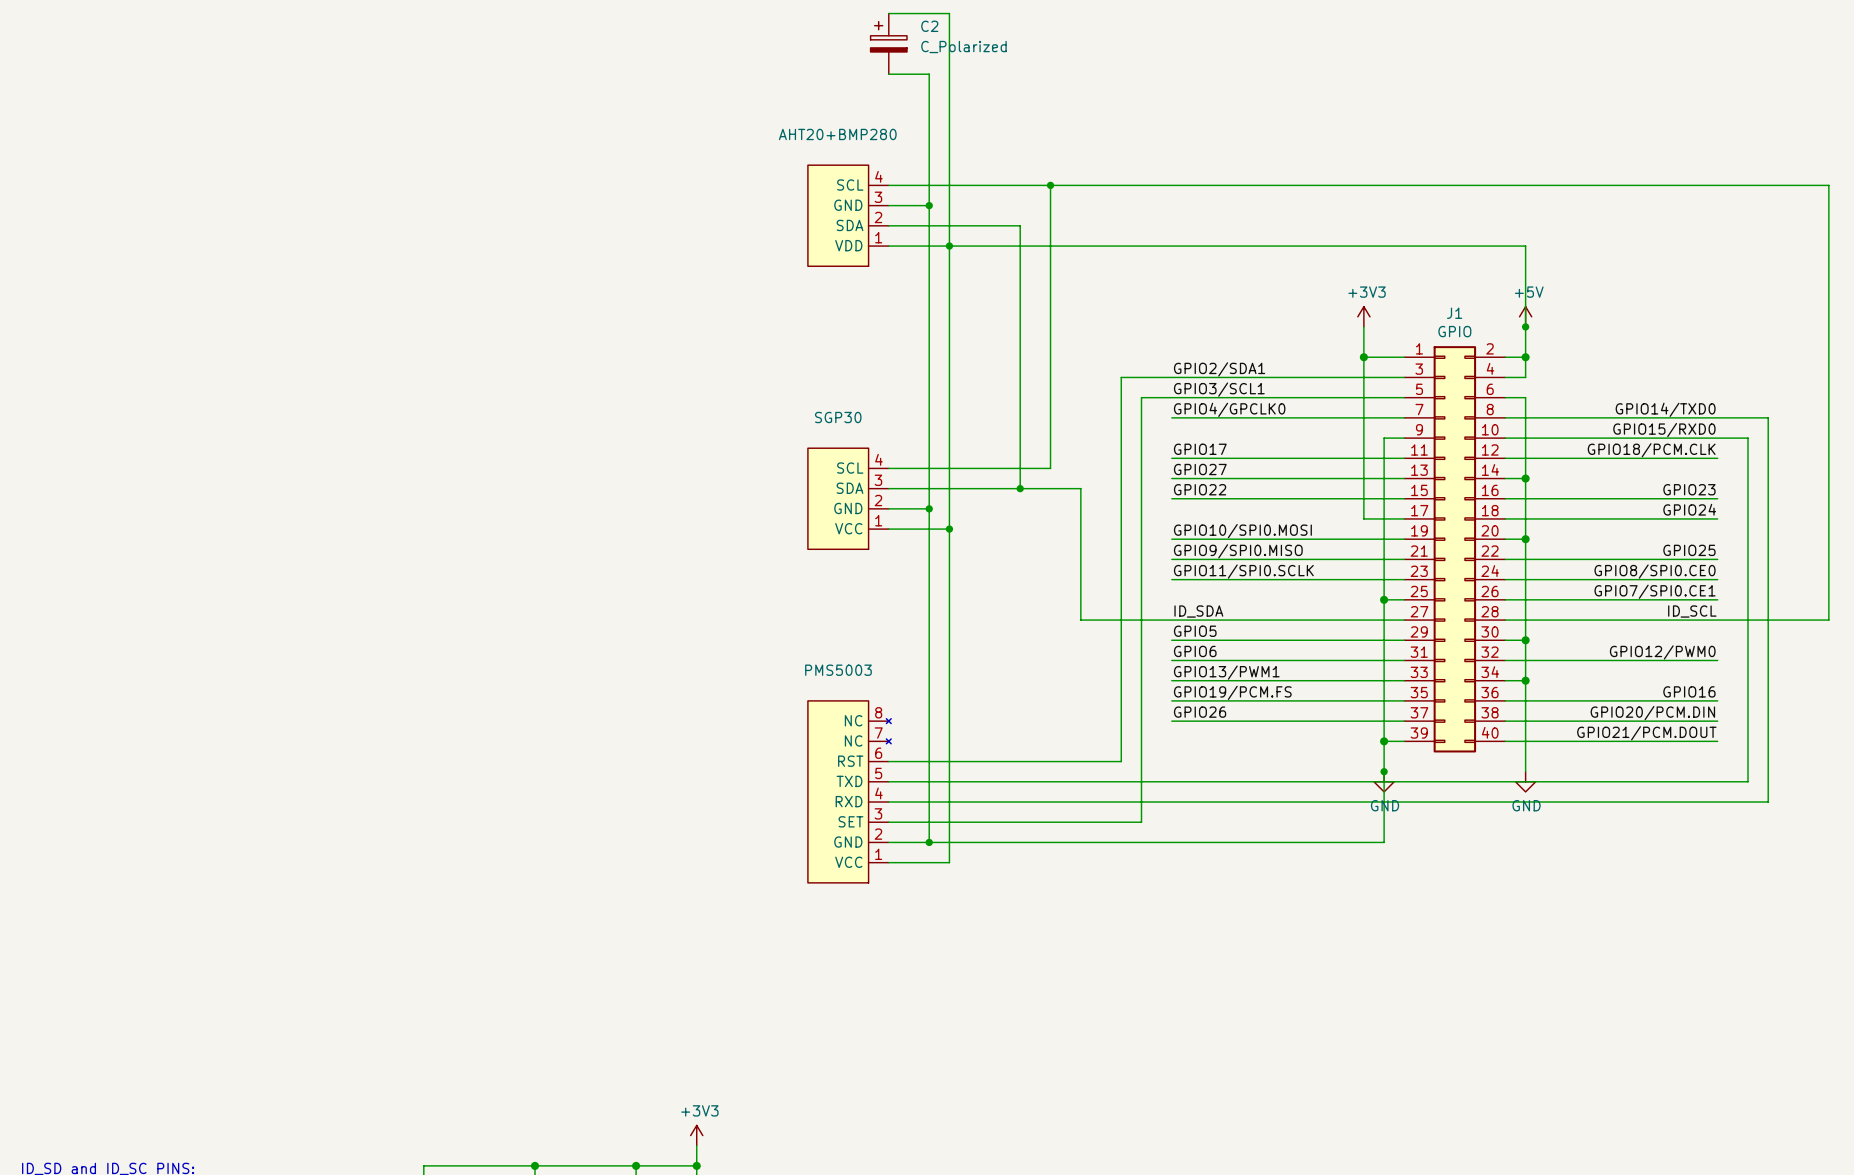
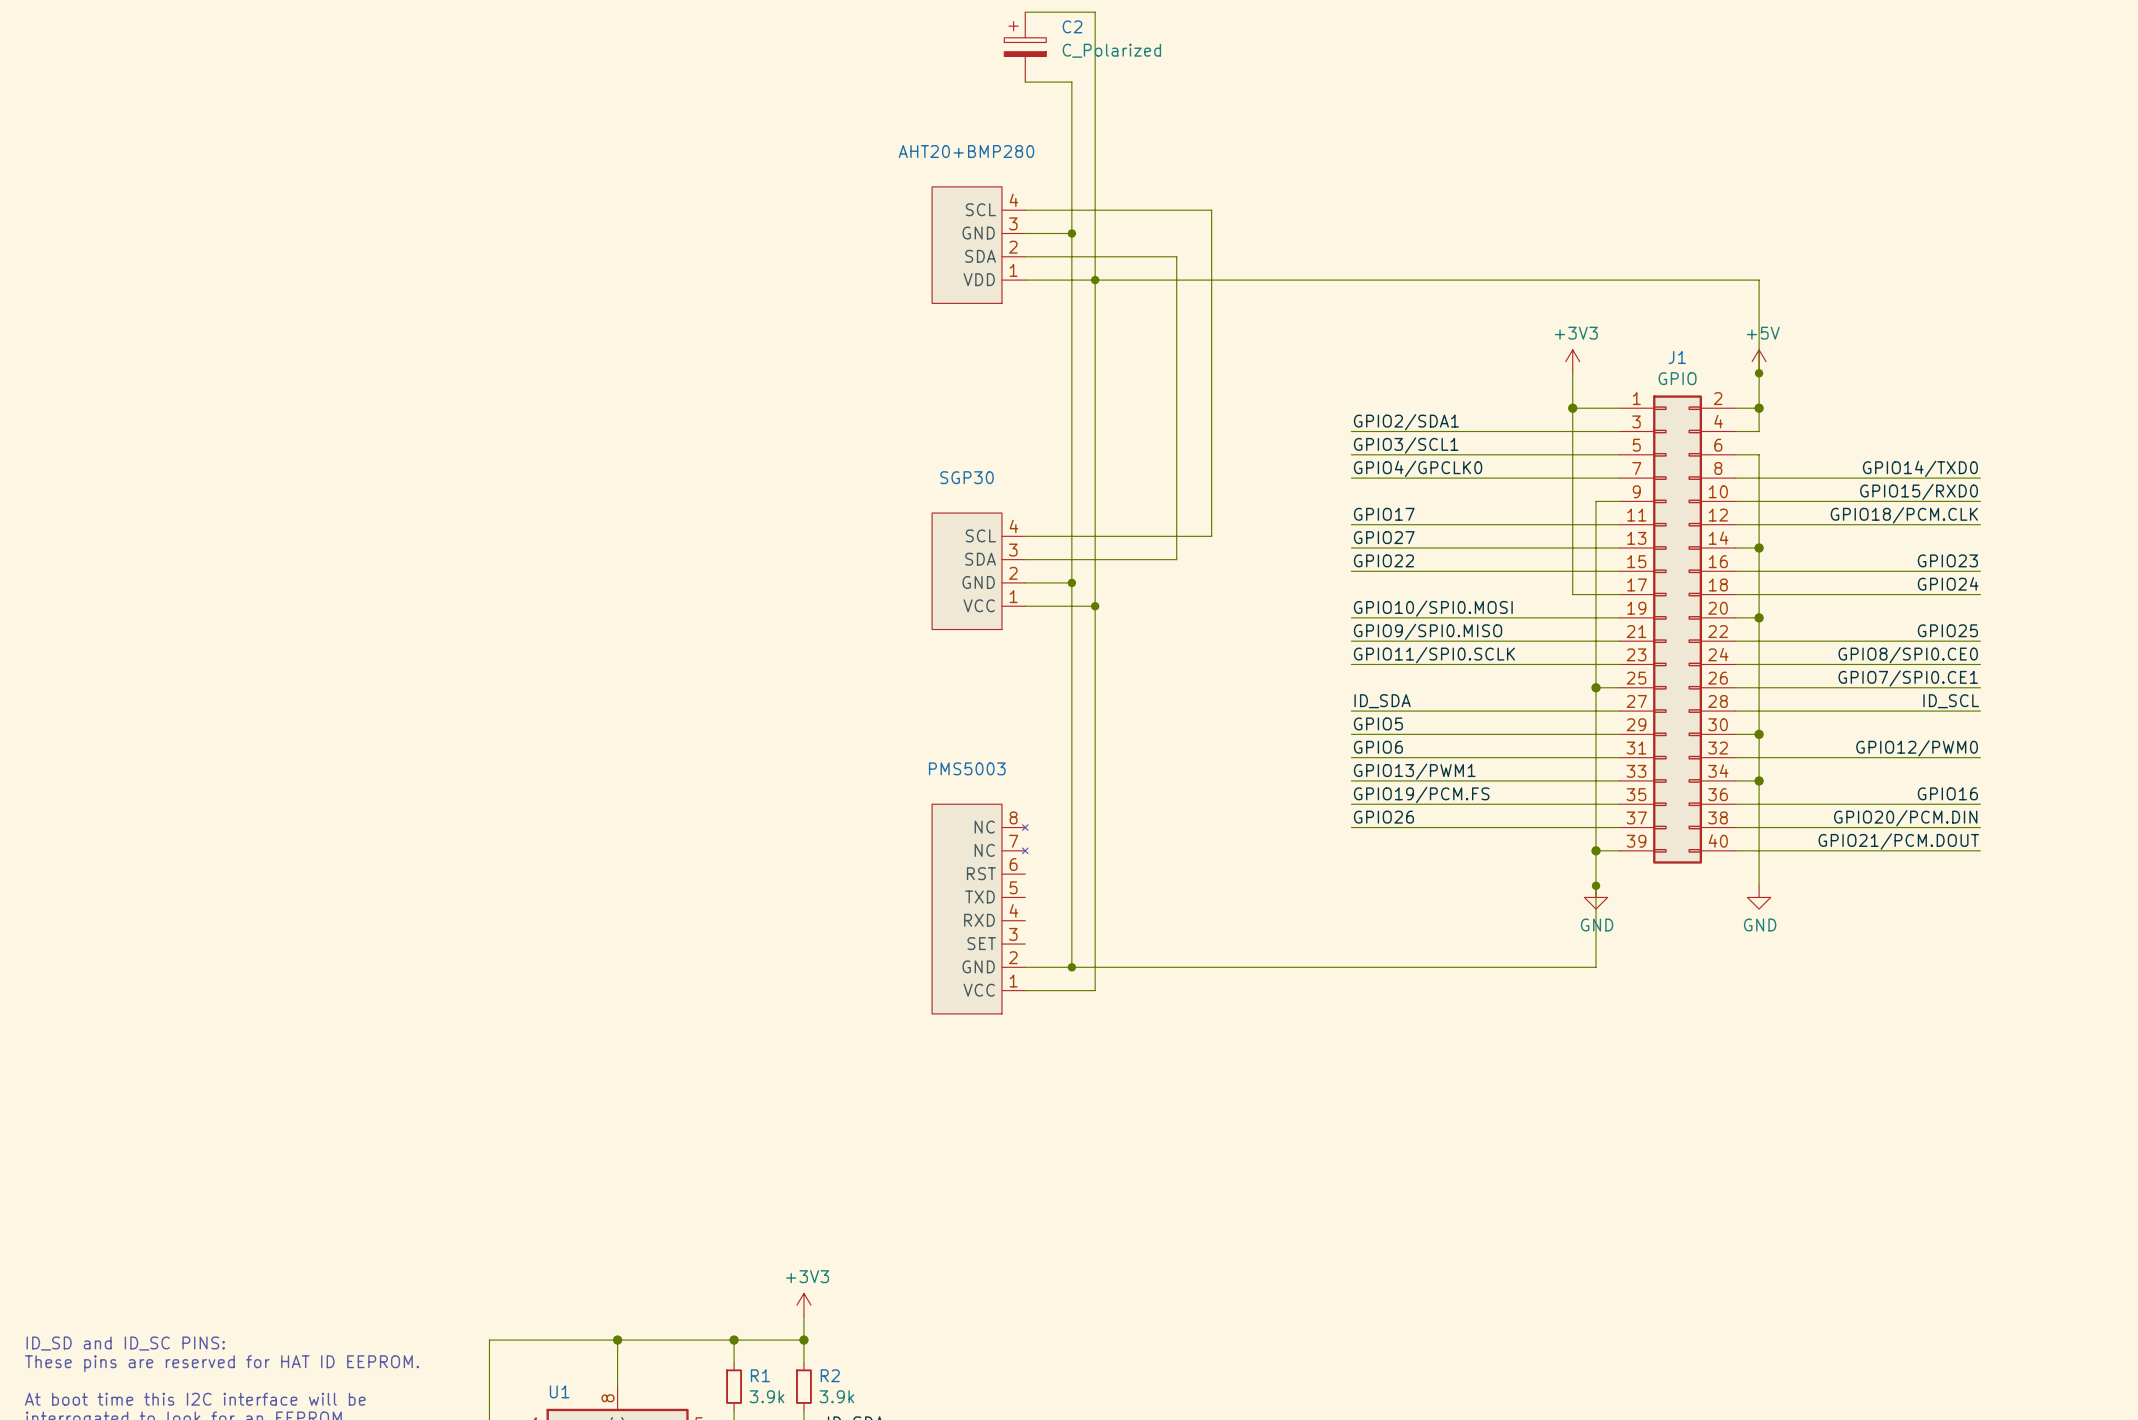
wire: (1050, 185) (1828, 185) (1828, 620) (1717, 620) -> none
junction: (1050, 185) -> none
wire: (1171, 377) (1121, 377) (1121, 761) (888, 761) -> none
wire: (1171, 397) (1141, 397) (1141, 822) (888, 822) -> none
wire: (1717, 417) (1768, 417) (1768, 802) (888, 802) -> none
wire: (1717, 438) (1748, 438) (1748, 781) (888, 781) -> none
wire: (1020, 488) (1080, 488) (1080, 620) (1171, 620) -> none
junction: (1020, 488) -> none

